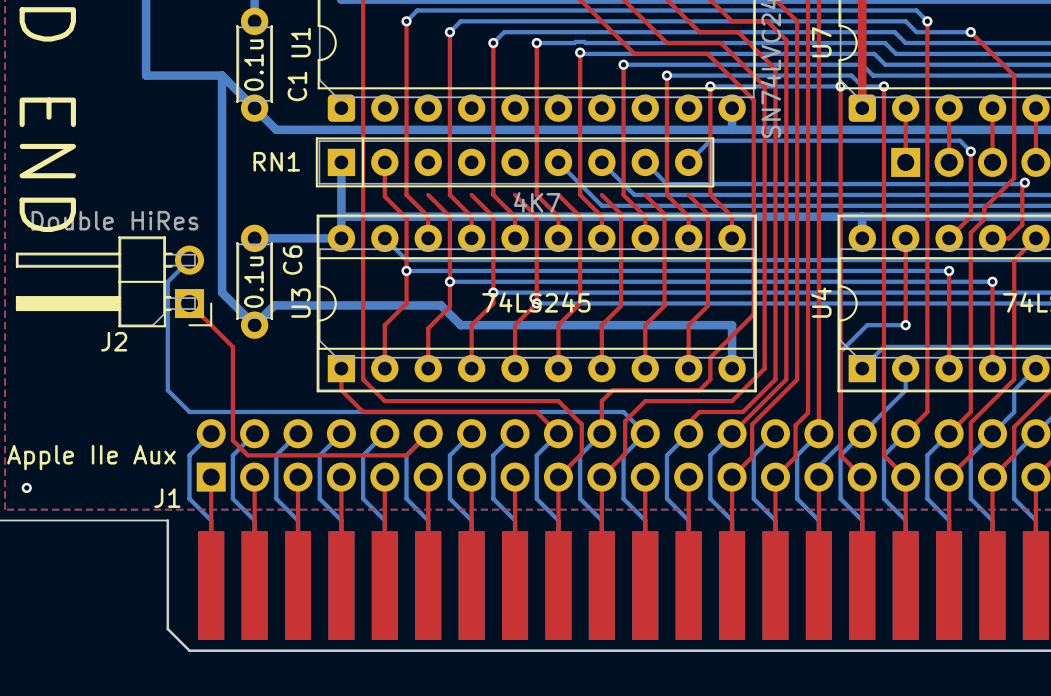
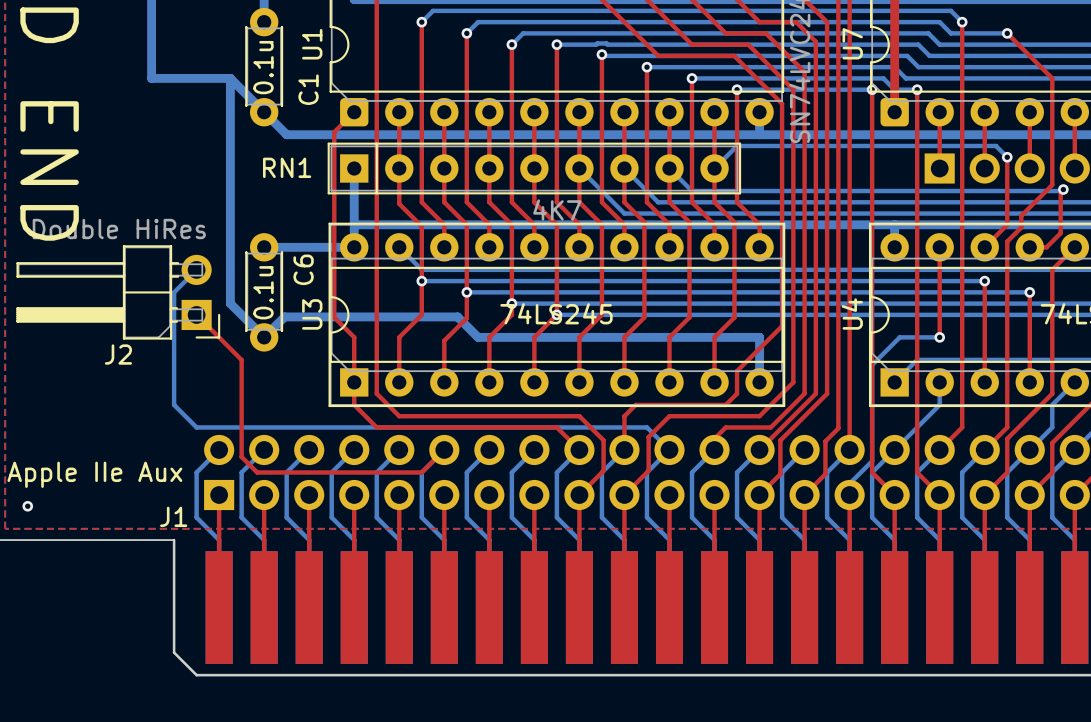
top track: none -> (354, 112) (334, 132) (334, 317) (354, 337) (354, 382)
top track: none -> (399, 112) (399, 168)
top track: none -> (444, 112) (444, 202)
top track: none -> (489, 112) (489, 202)
top track: none -> (534, 112) (534, 202)
top track: none -> (579, 112) (579, 202)
top track: none -> (624, 112) (624, 202)
top track: none -> (669, 112) (669, 202)
top track: none -> (714, 112) (714, 202)

